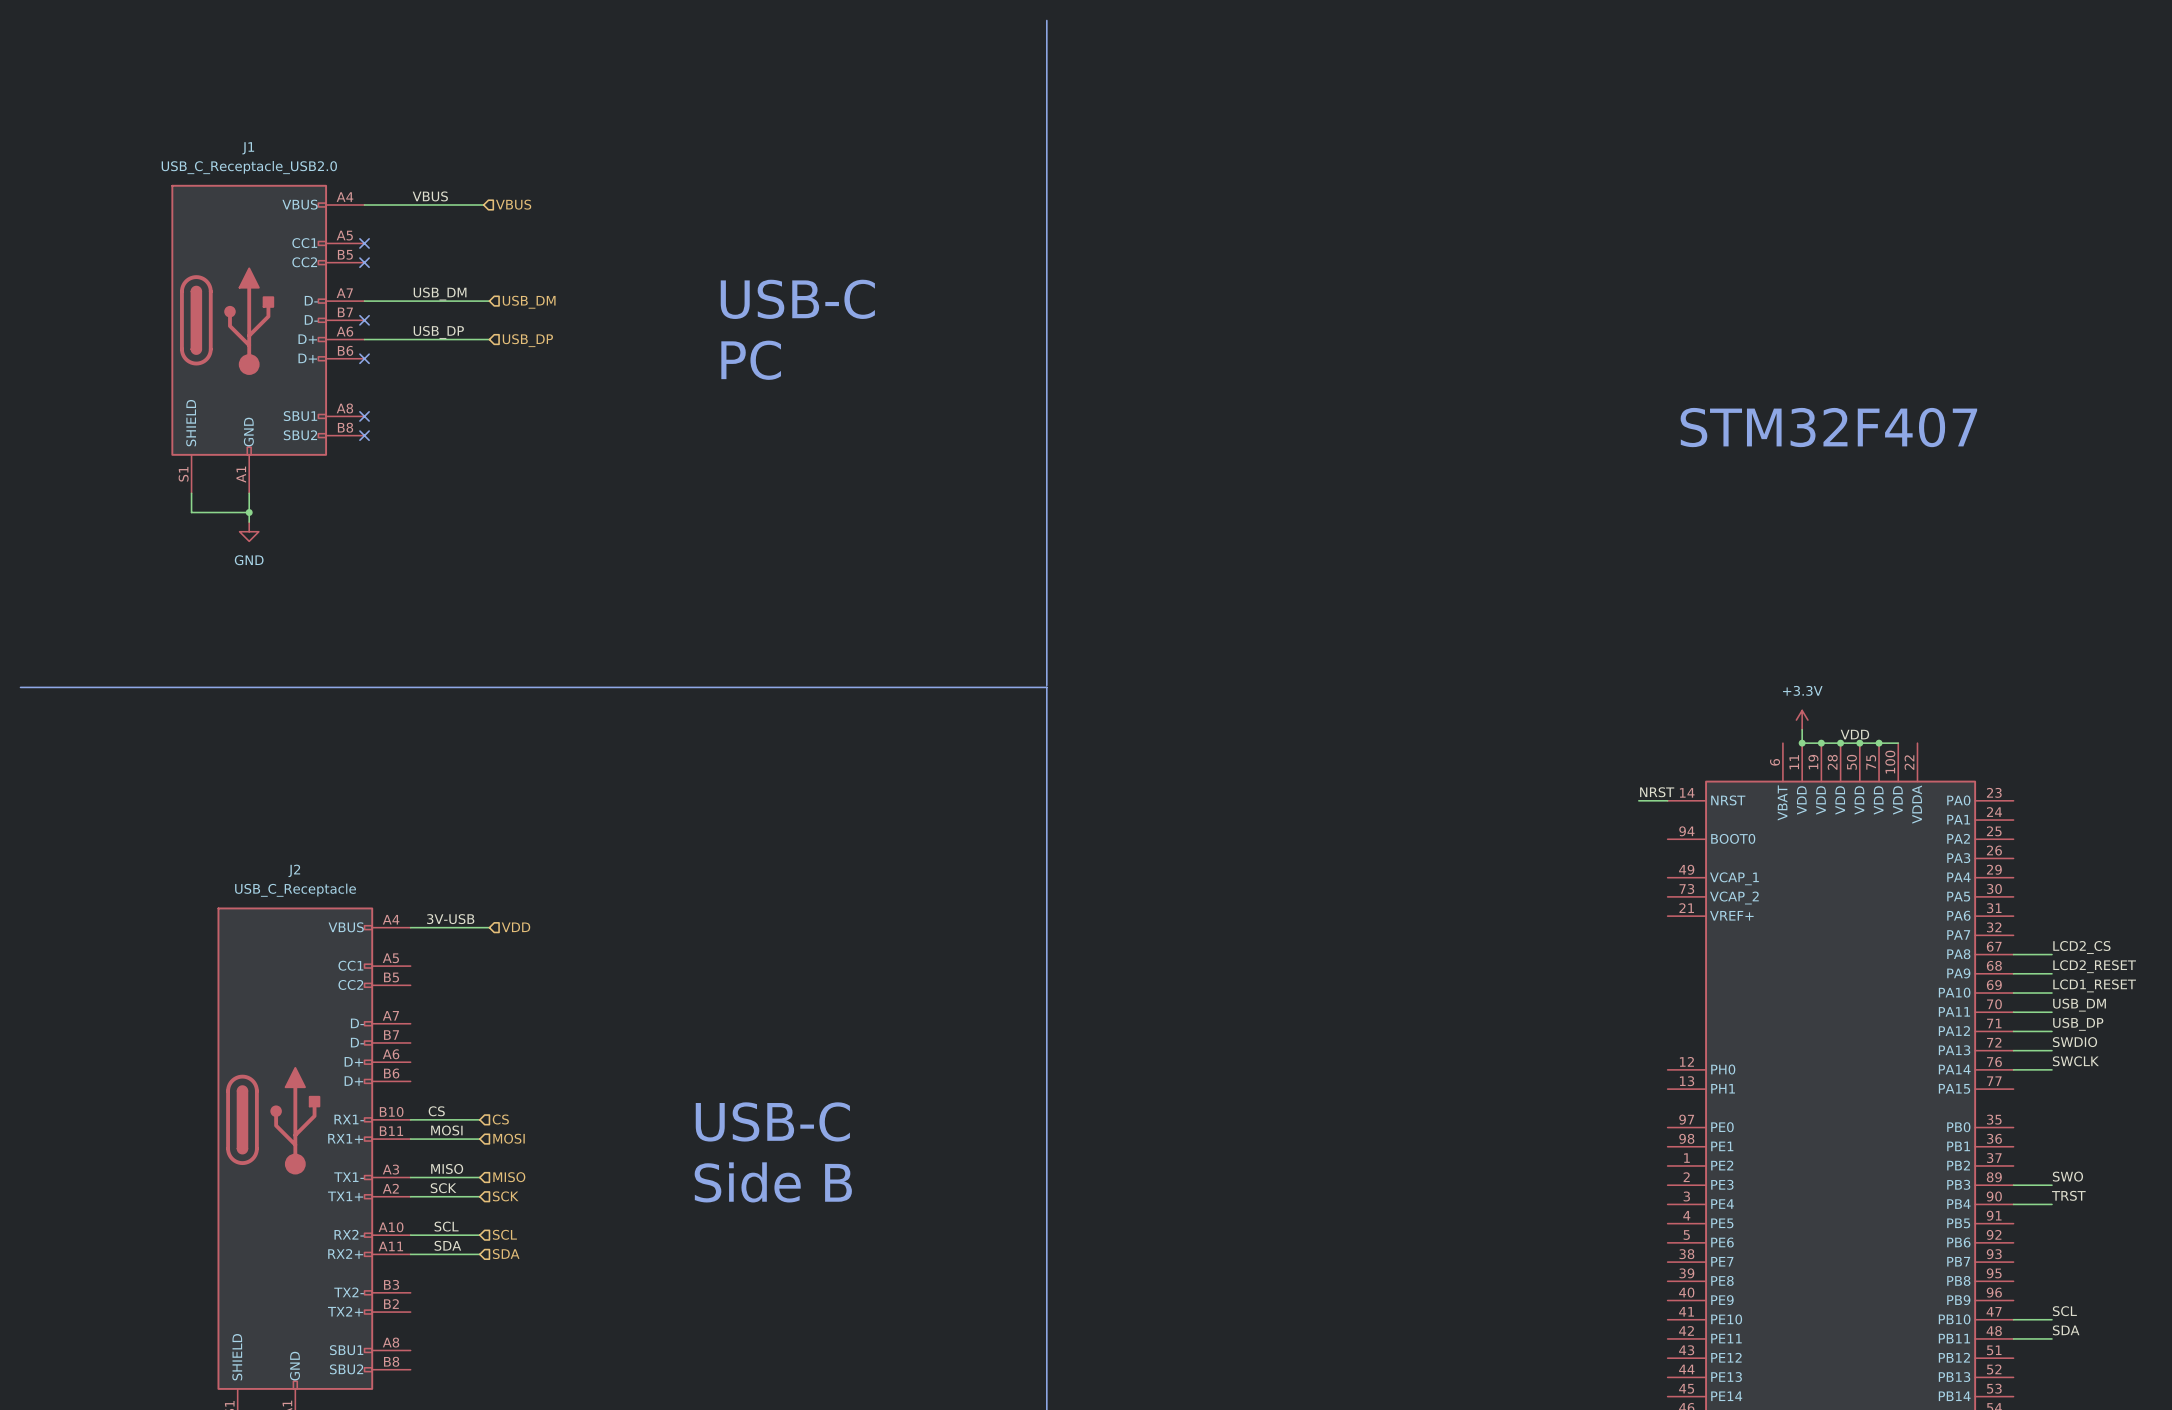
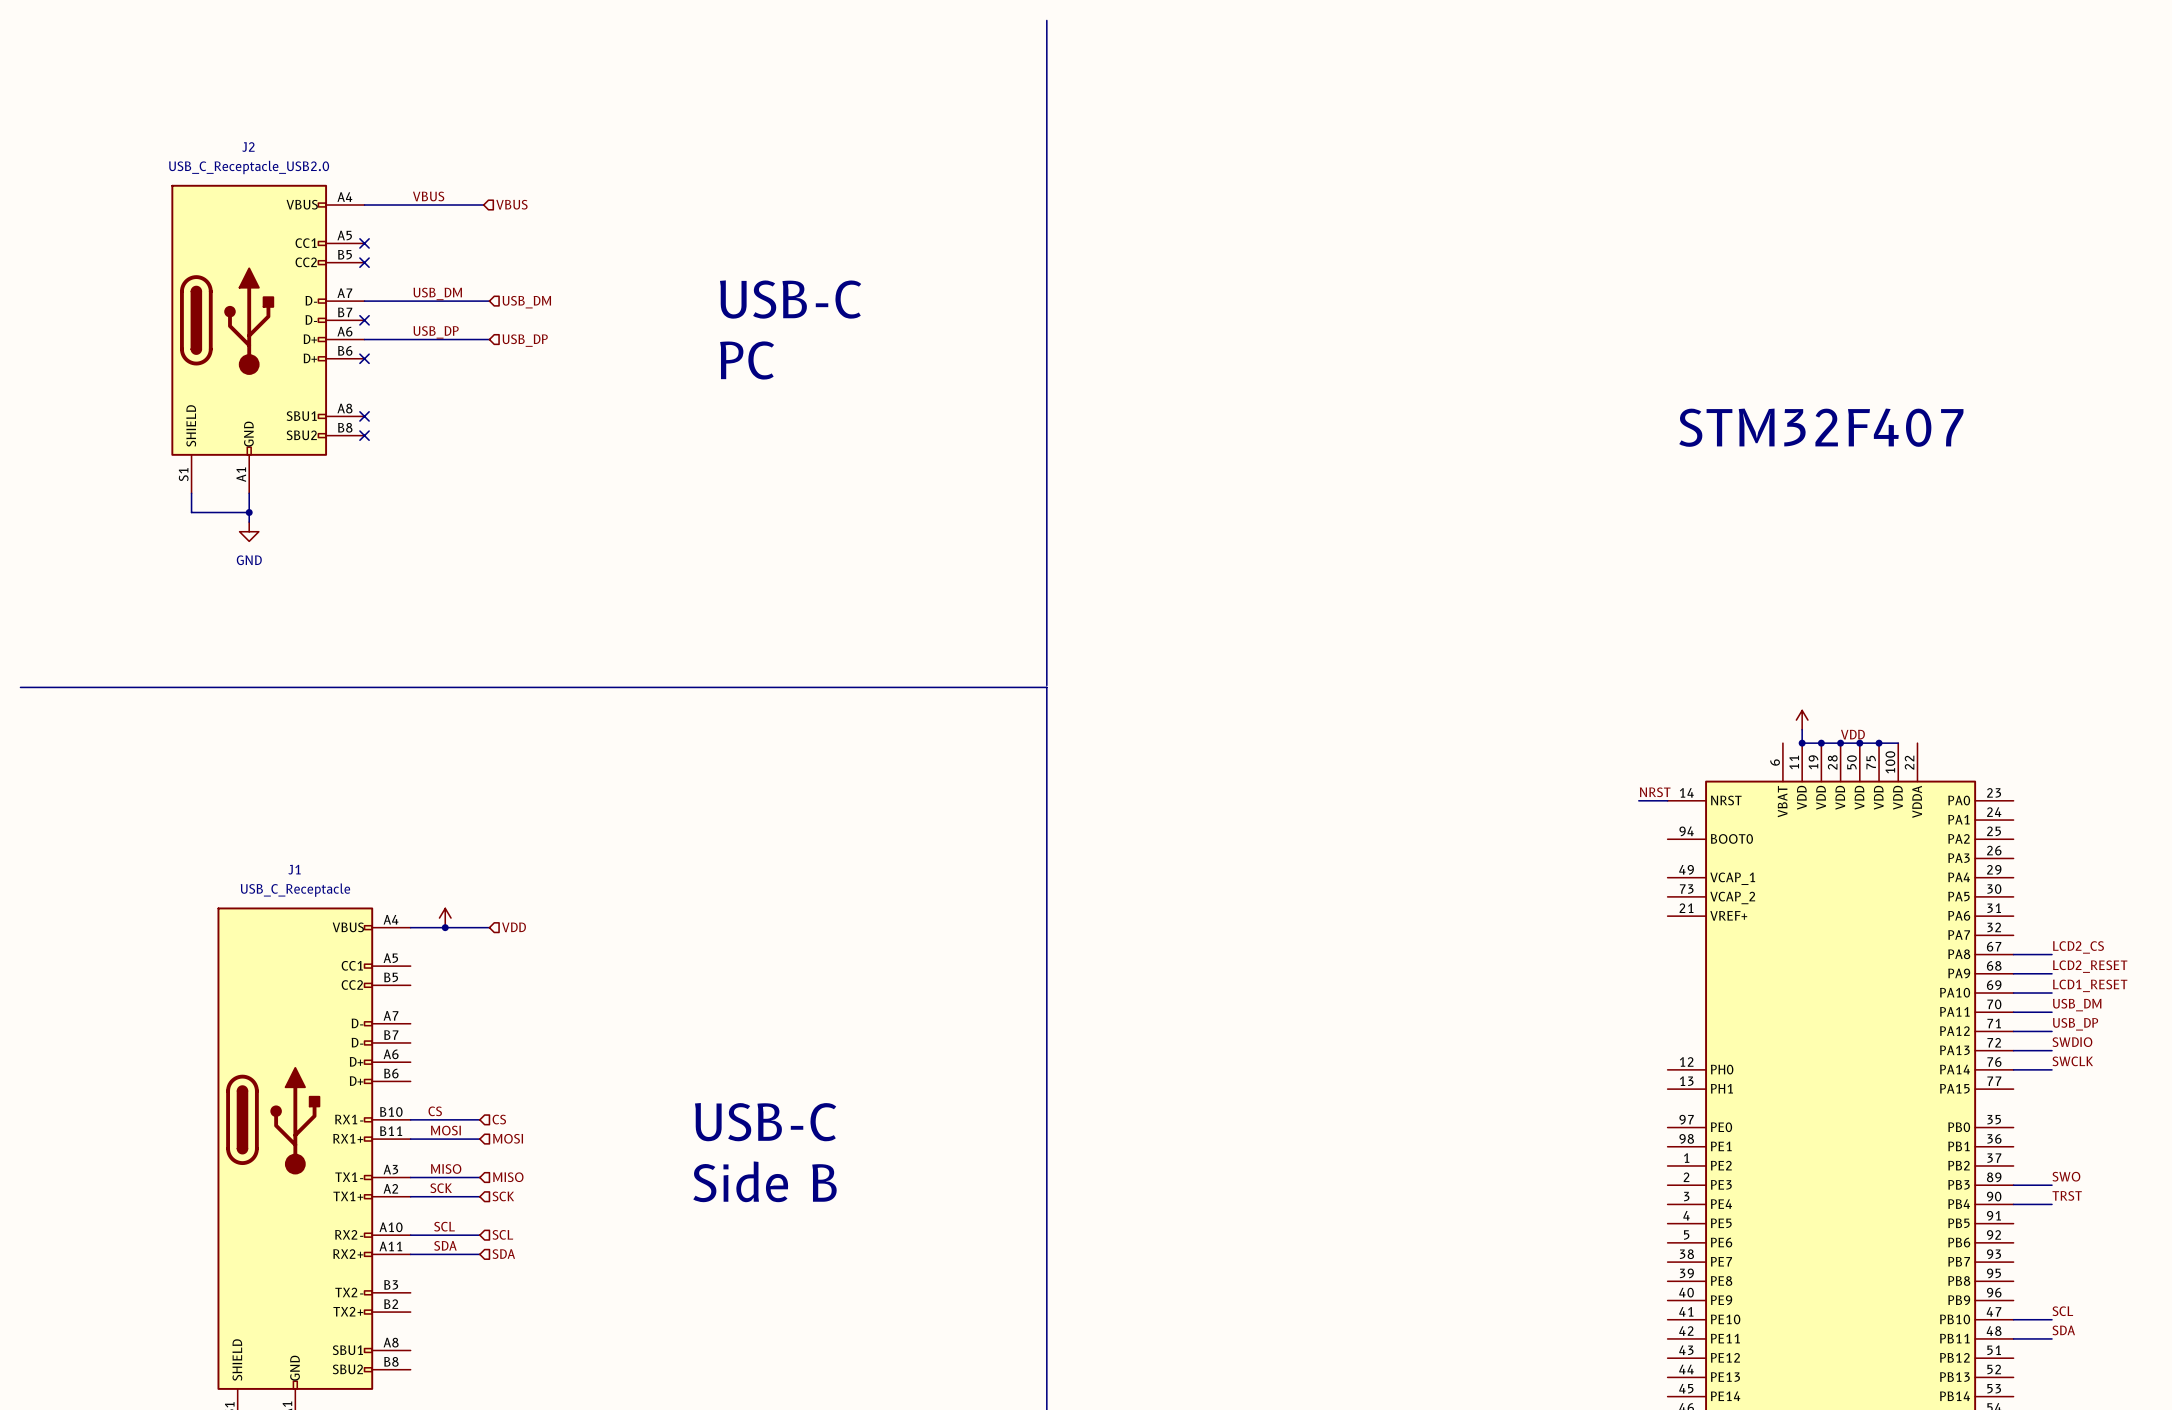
J1 name: J1 (248, 148) -> J2 (248, 147)
power symbol text: +3.3V (1802, 690) -> none
J2 name: J2 (294, 870) -> J1 (294, 869)
power symbol: none -> (445, 918)
label: 3V-USB (450, 919) -> none
junction: none -> (445, 927)

